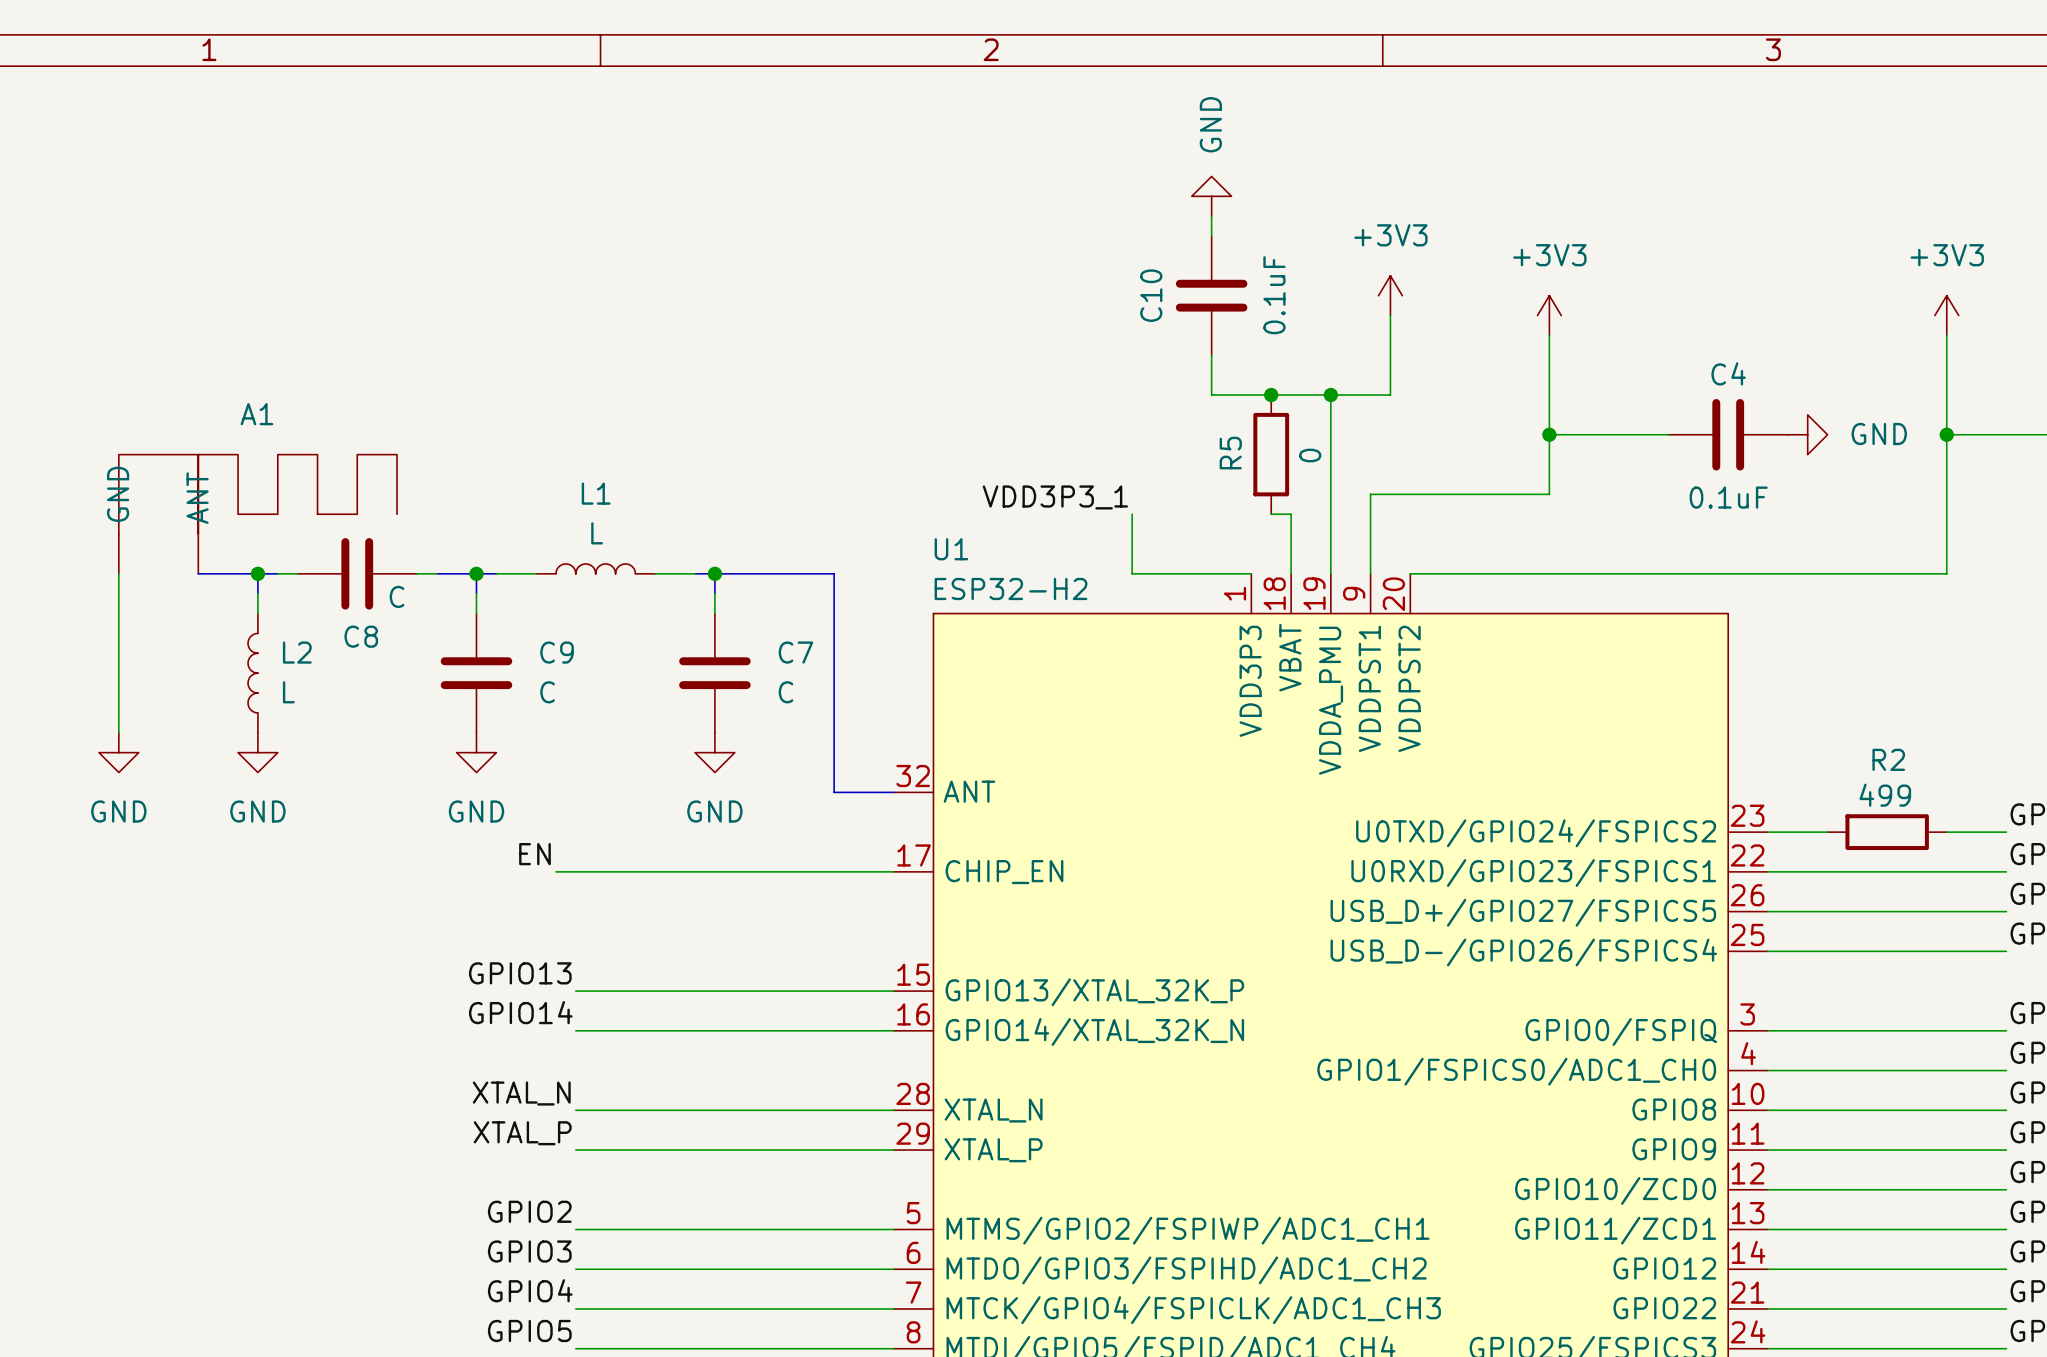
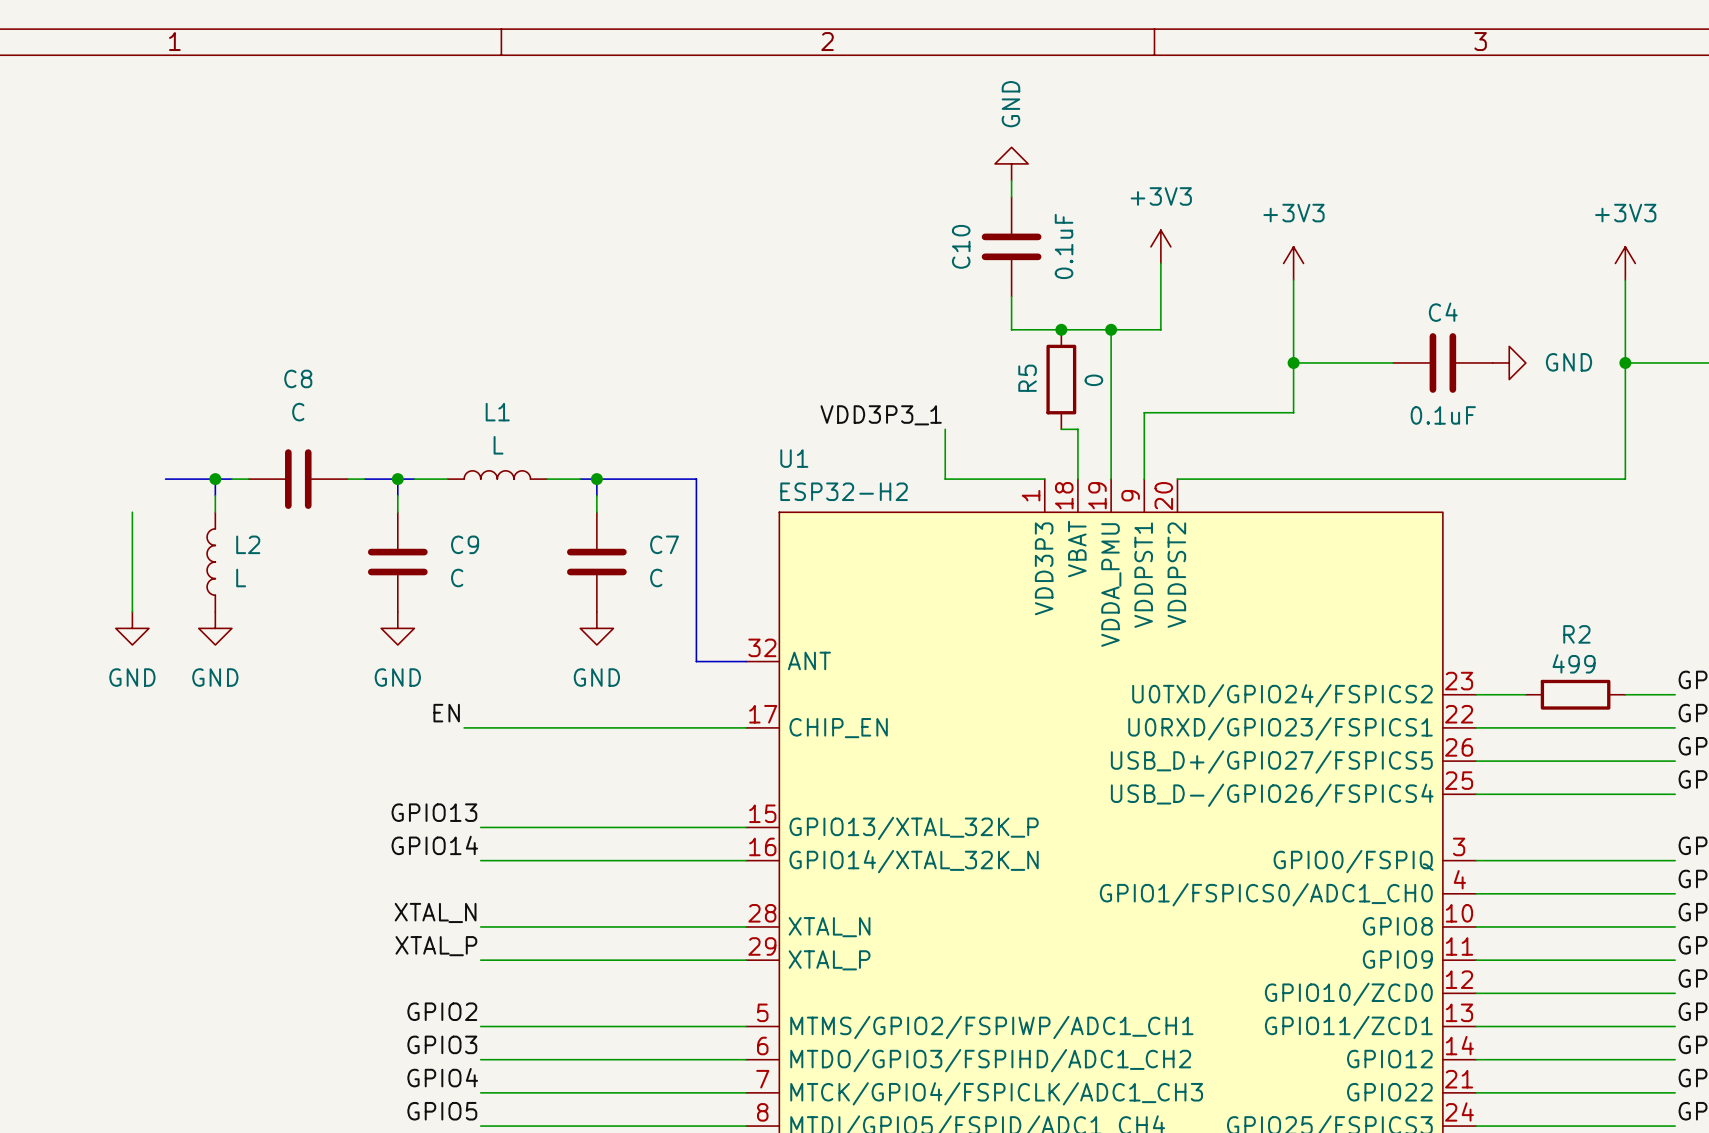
A1: (257, 514) -> none
wire: (118, 573) (118, 732) -> none
C8 value position: C (397, 596) -> C (298, 412)
wire: none -> (132, 512) (132, 611)
C8 name position: C8 (361, 636) -> C8 (298, 378)
power symbol position: GND (118, 752) -> GND (132, 628)

